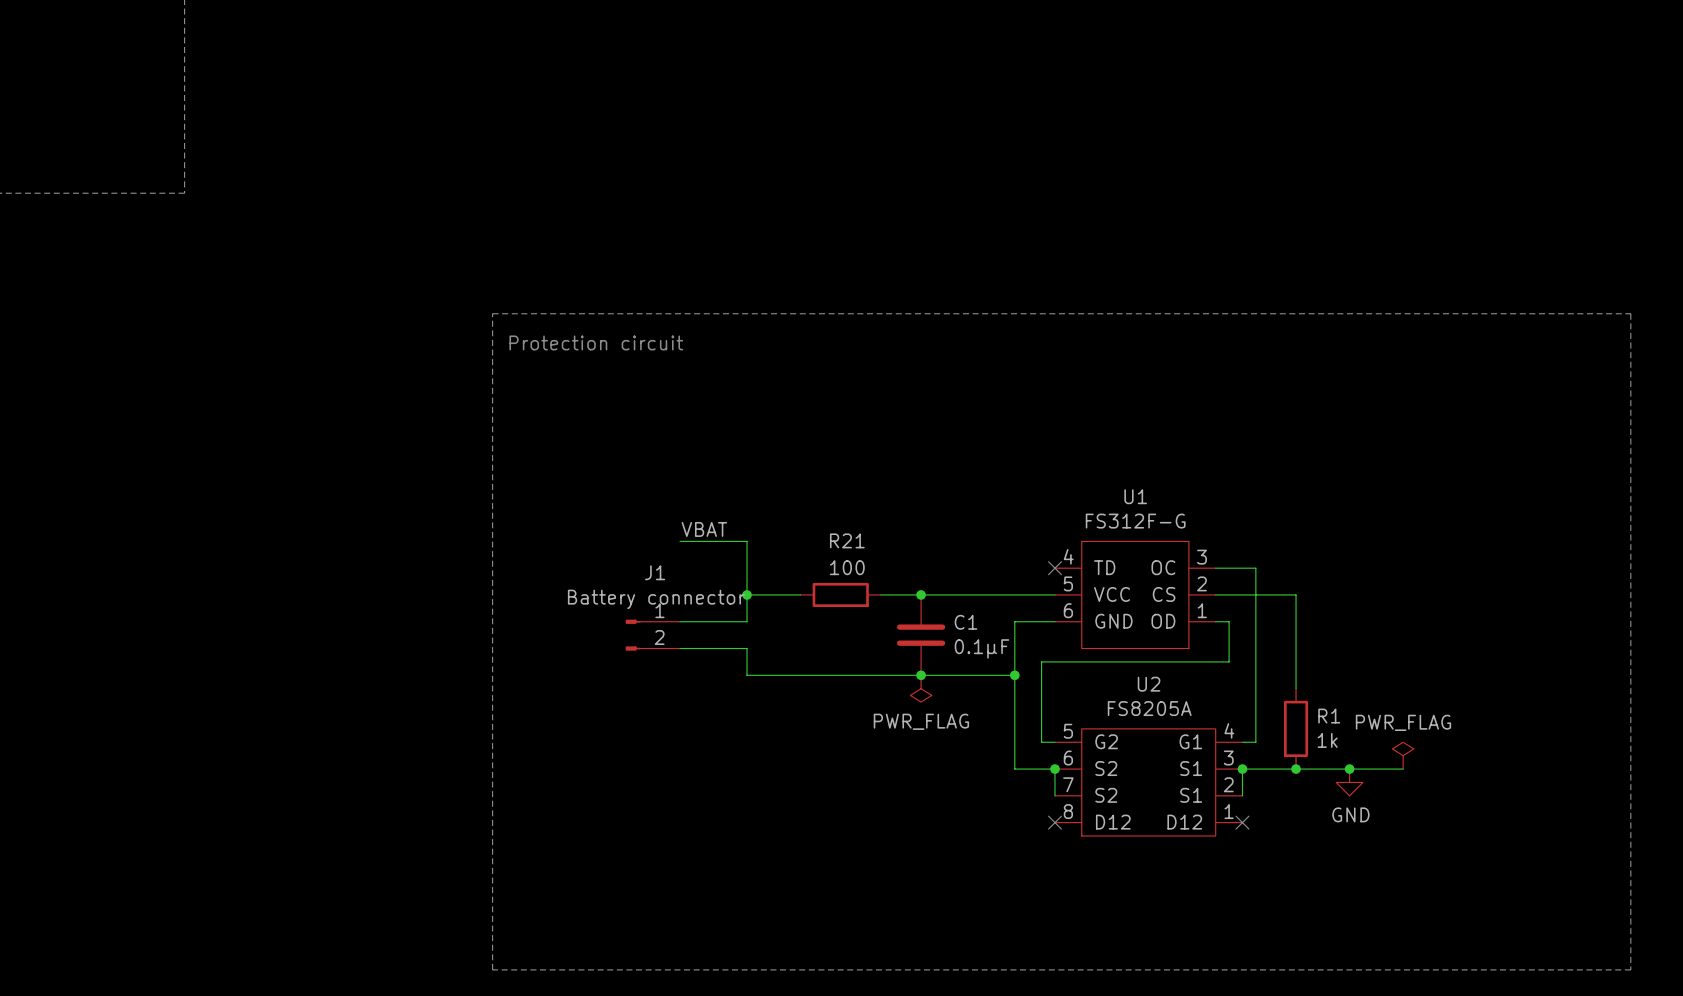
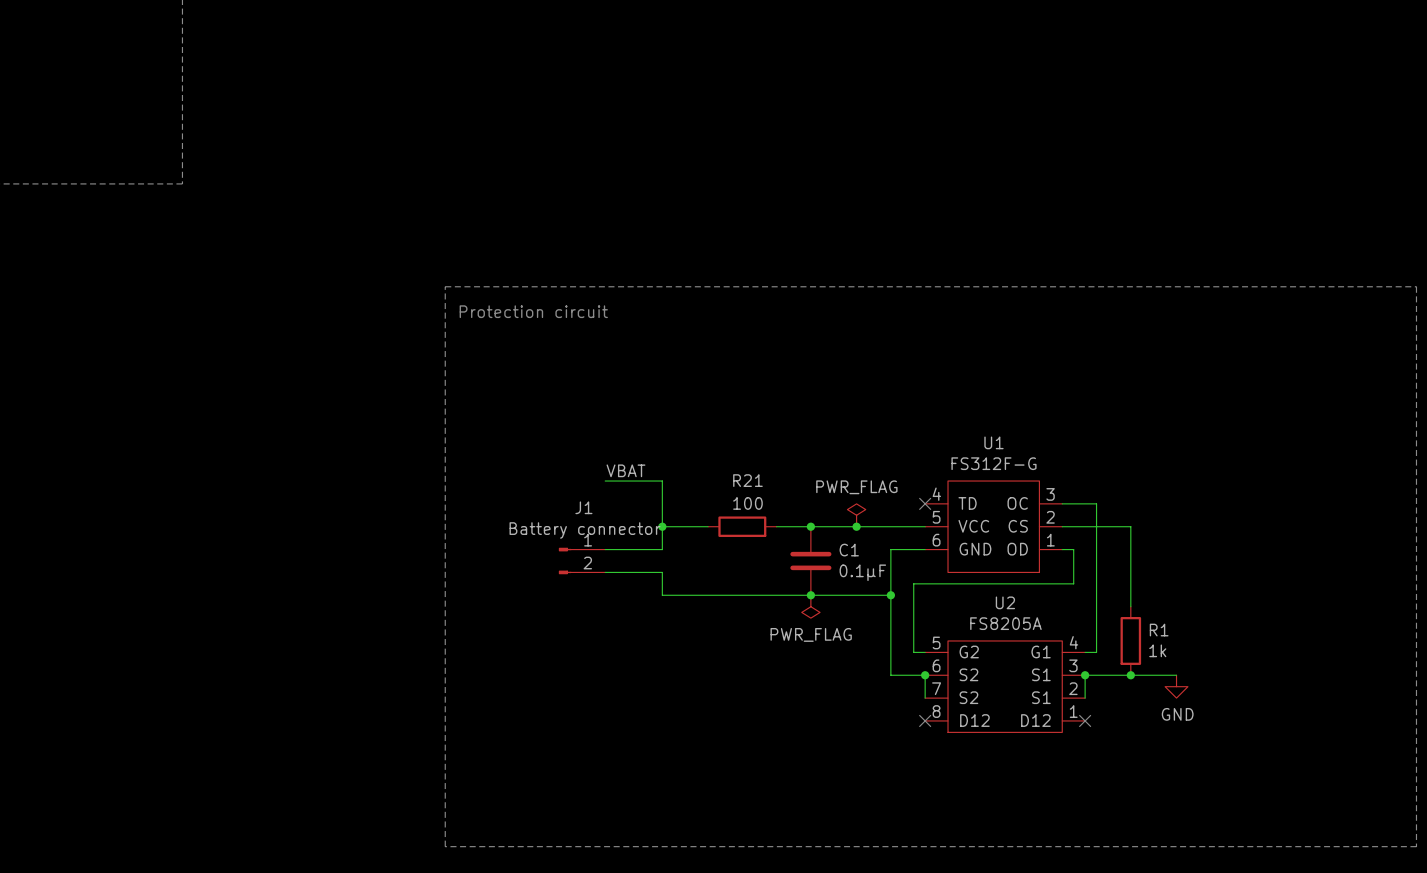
power symbol: none -> PWR_FLAG (856, 515)
junction: none -> (856, 526)
power symbol: PWR_FLAG (1403, 755) -> none
wire: (1349, 769) (1403, 769) -> none
junction: (1349, 769) -> none

